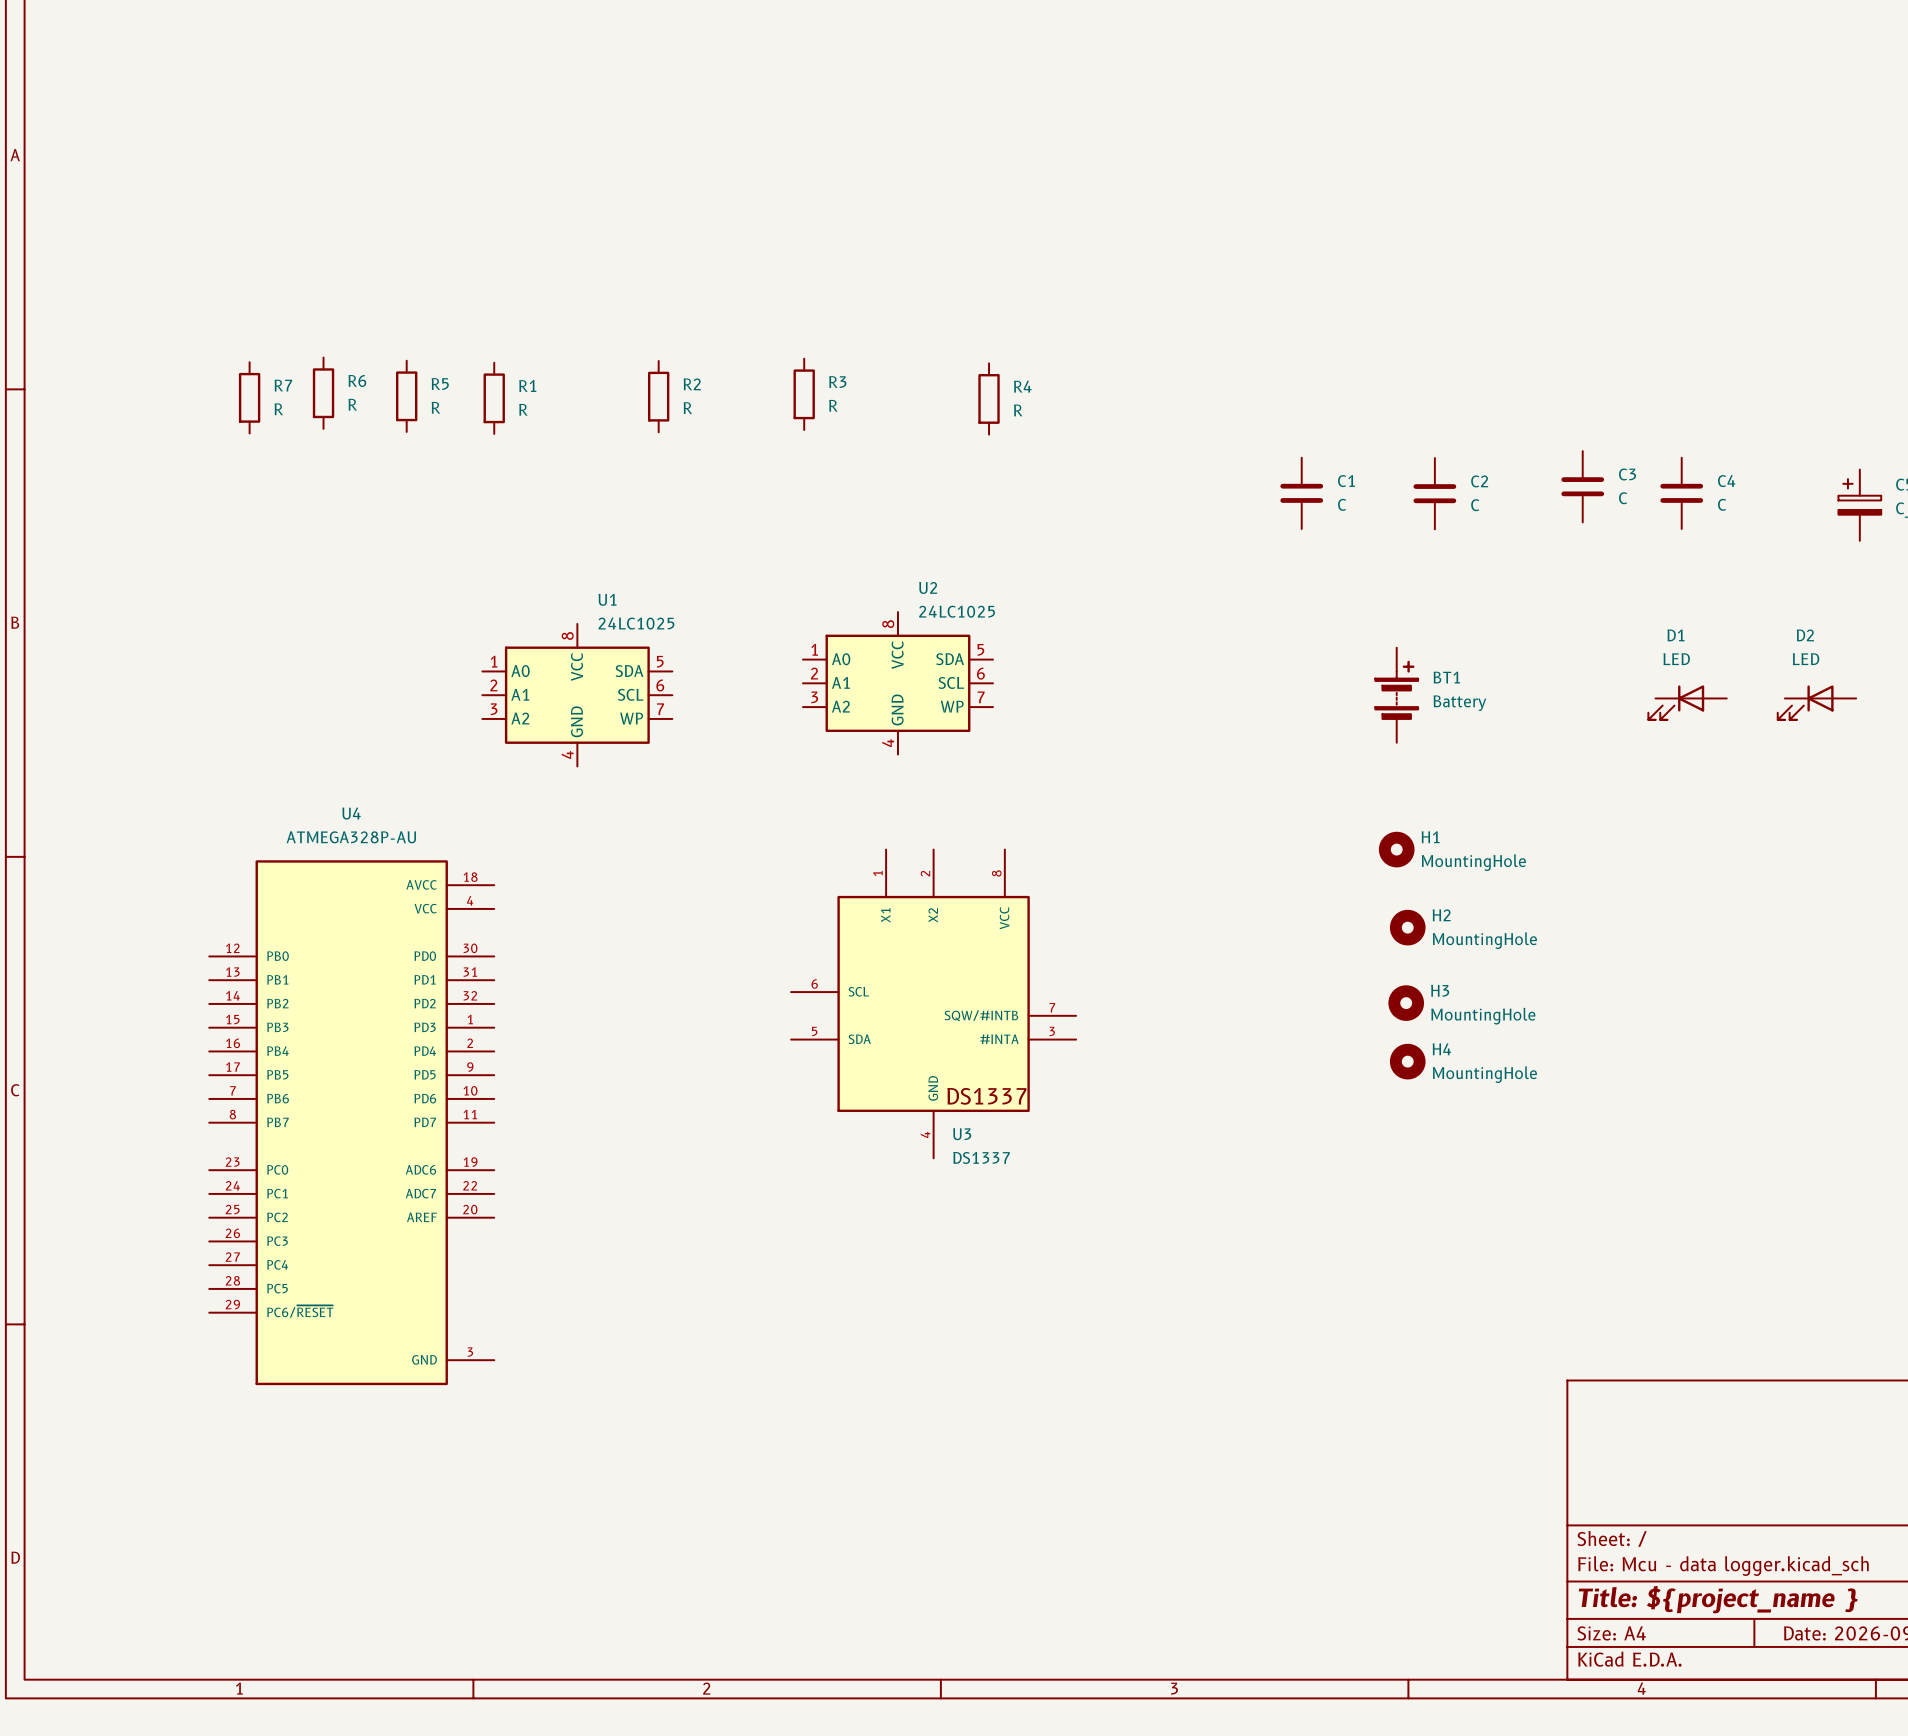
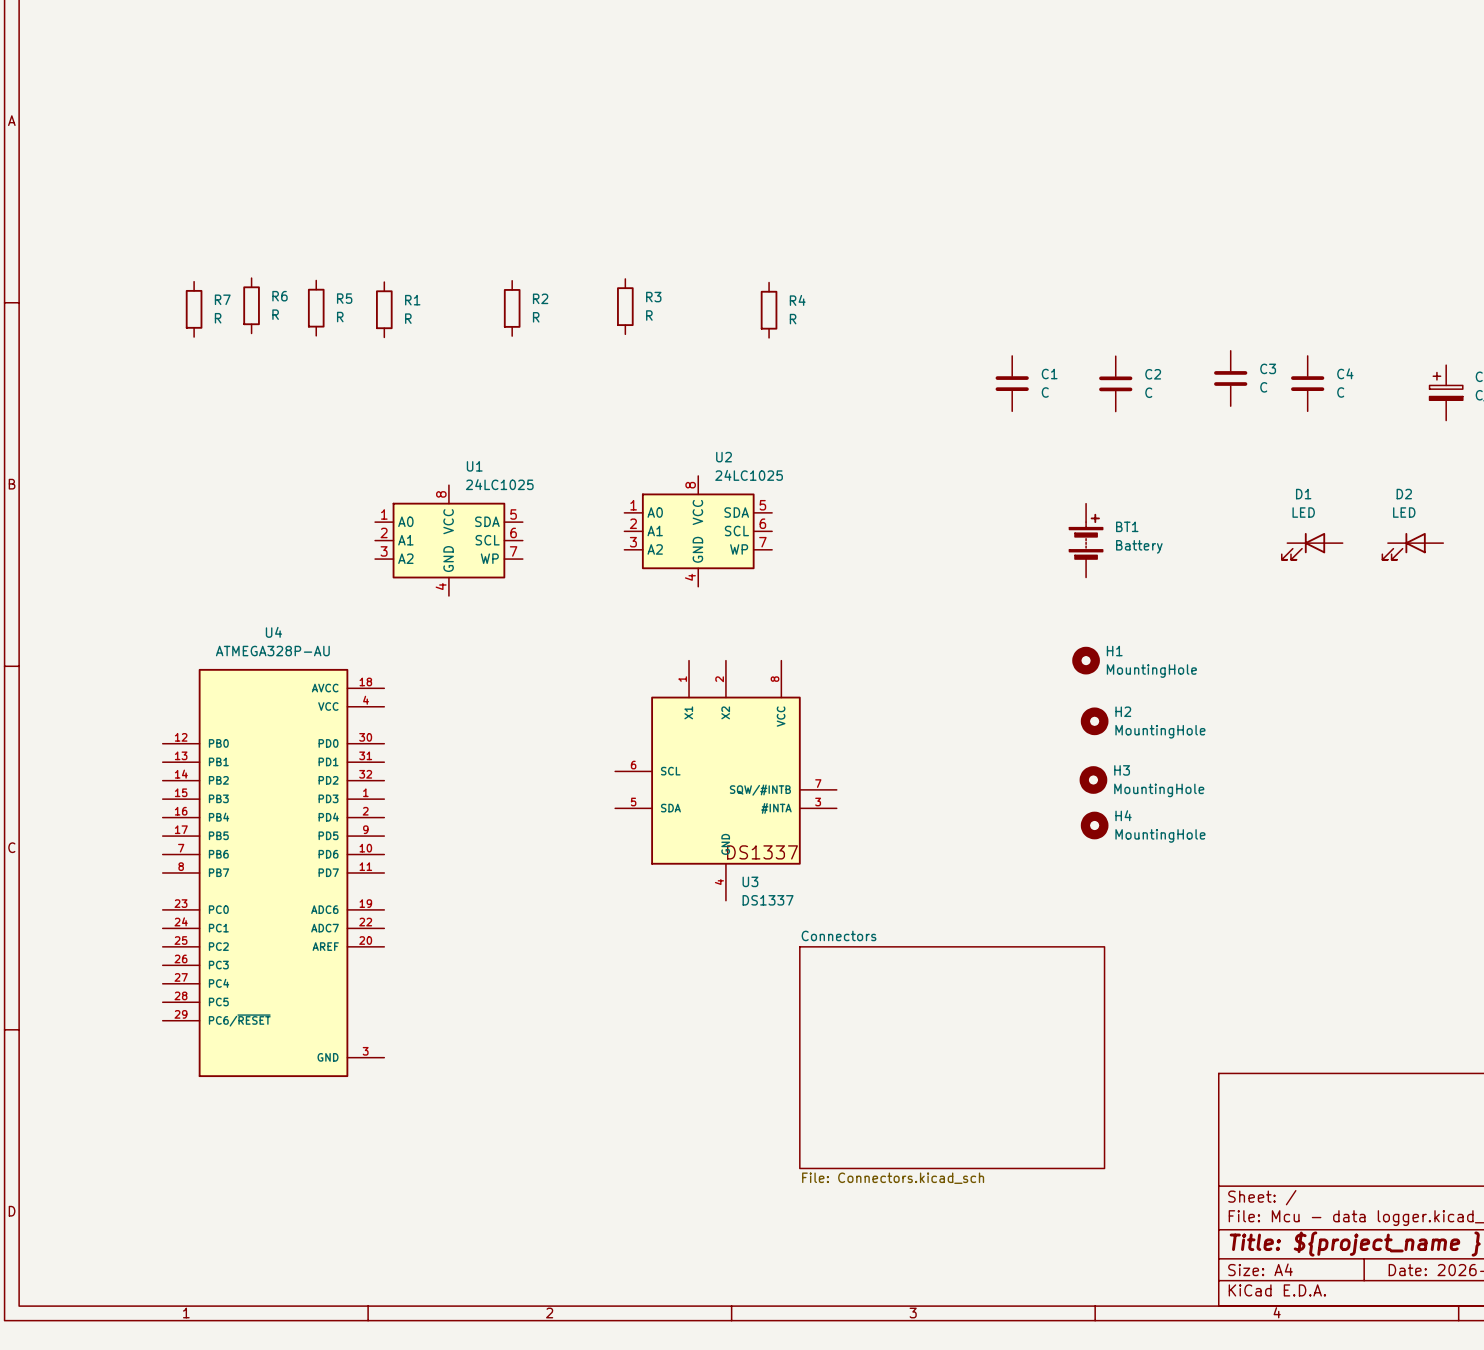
sheet Connectors: none -> File: Connectors.kicad_sch (952, 1057)

